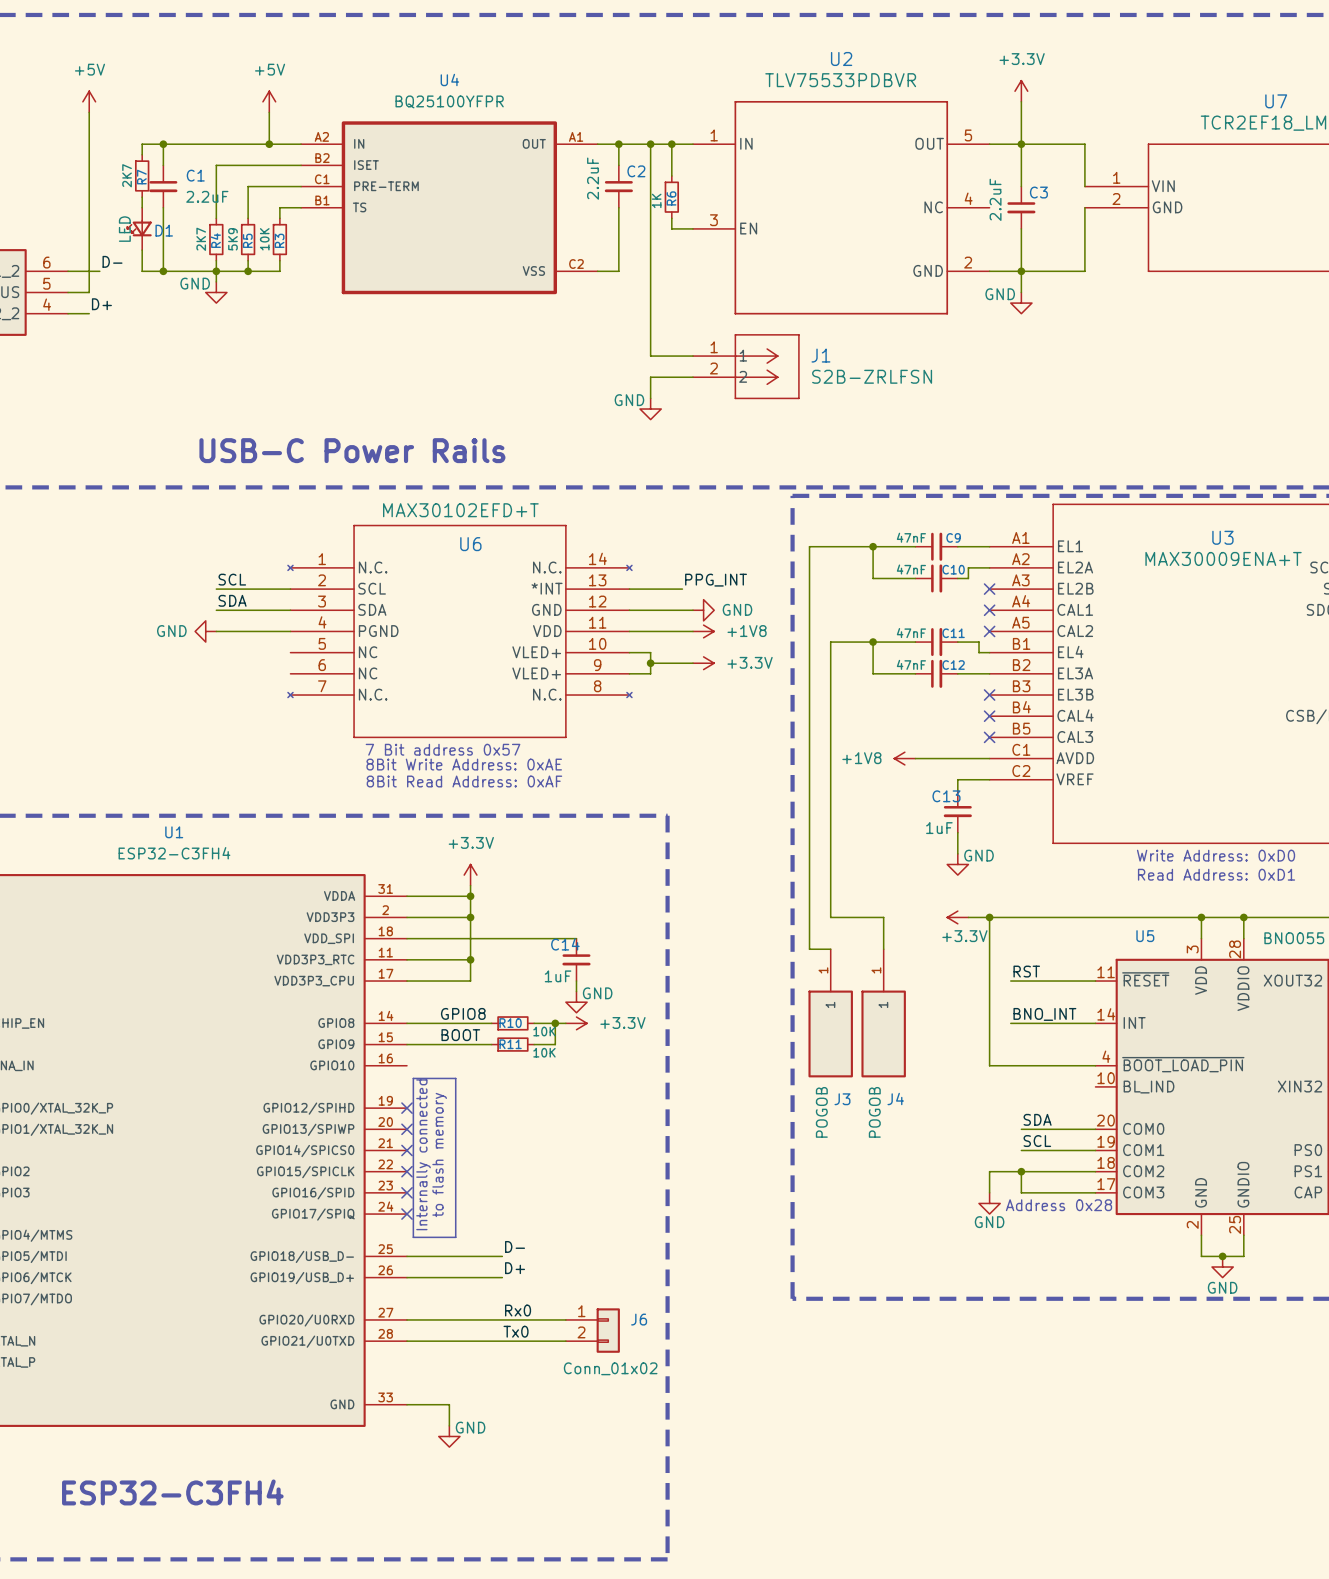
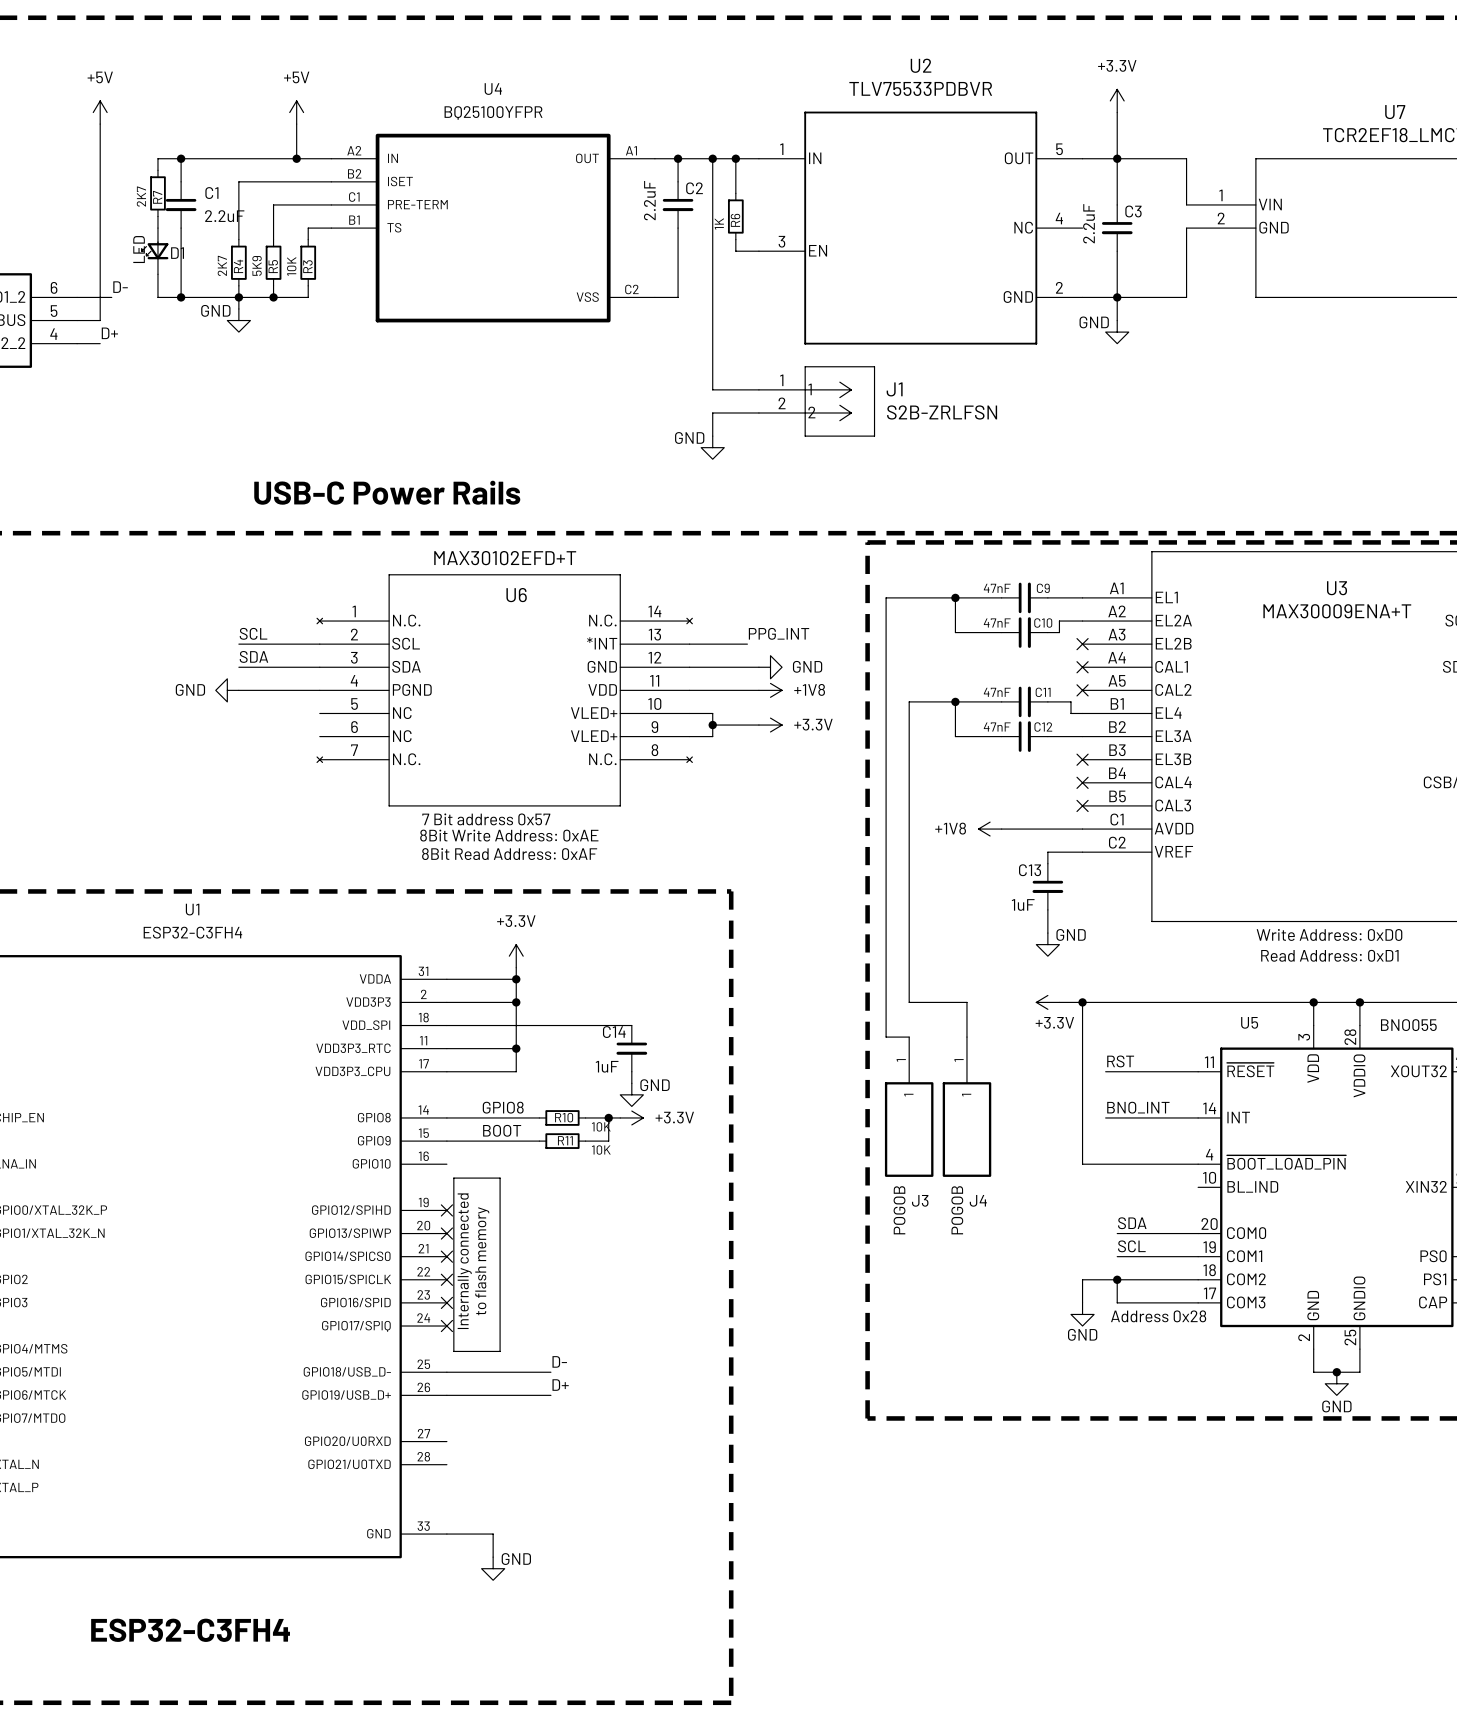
label: Rx0 (518, 1310) -> none
wire: (407, 1319) (565, 1319) -> none
J6: Conn_01x02 (592, 1330) -> none
label: Tx0 (516, 1331) -> none
wire: (407, 1341) (565, 1341) -> none

